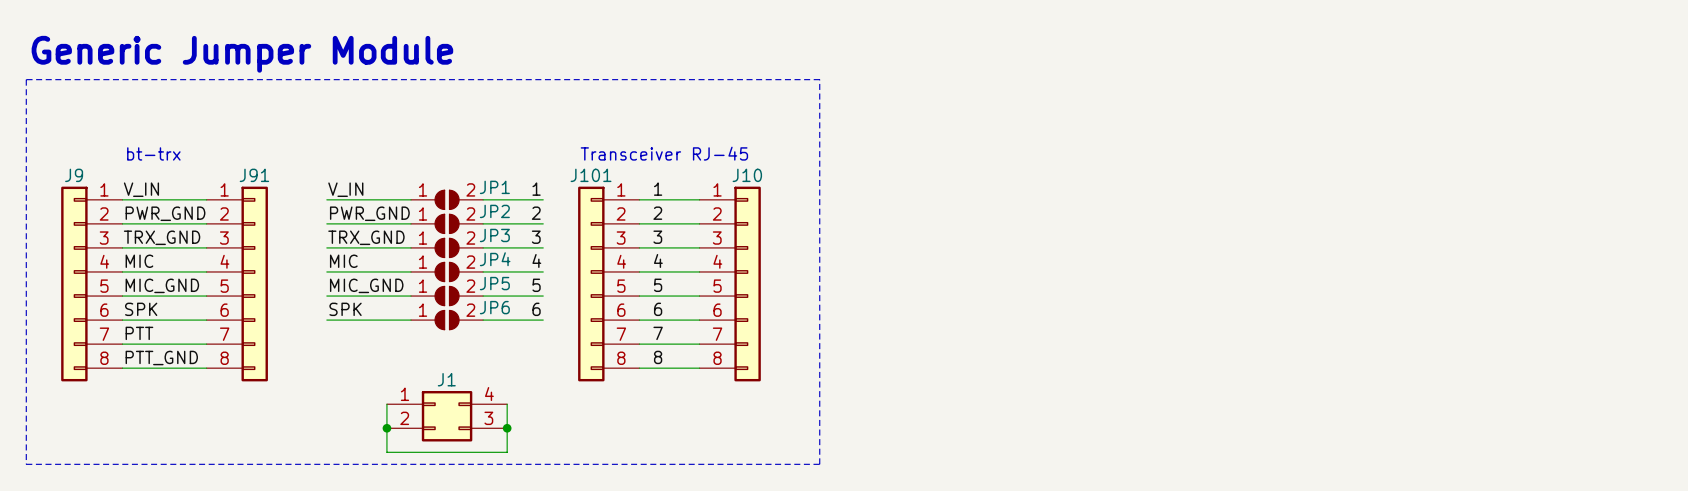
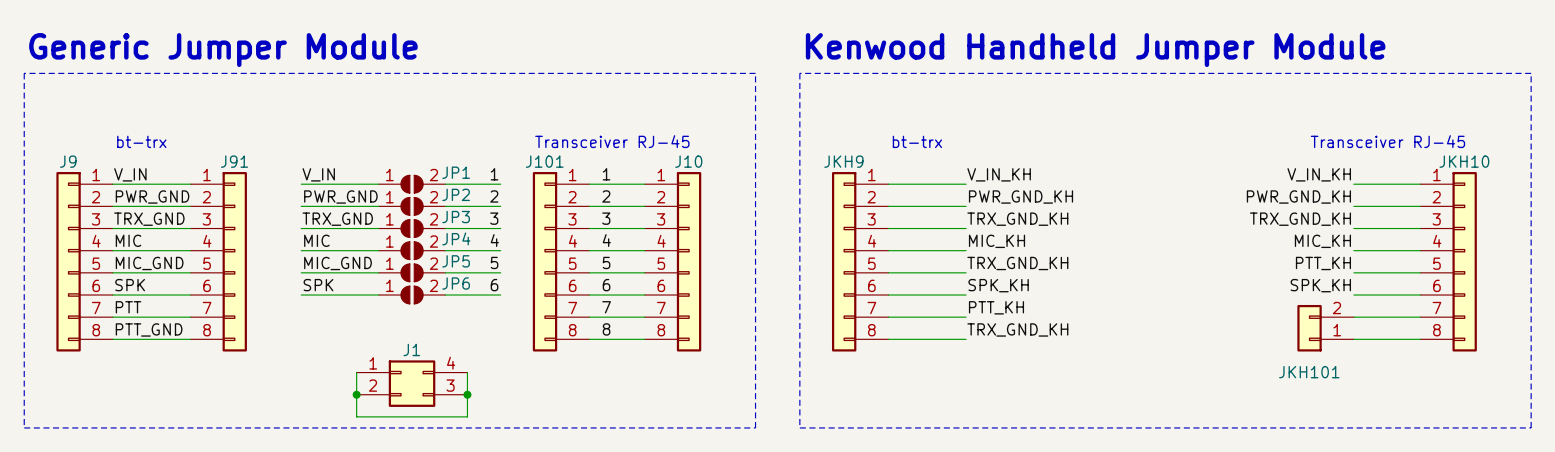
text: none -> Kenwood Handheld Jumper Module (1095, 50)
line: none -> (799, 73) (799, 427) (1531, 427) (1531, 73) (799, 73)
text: none -> bt-trx (917, 141)
text: none -> Transceiver RJ-45 (1387, 141)
label: none -> V_IN_KH (999, 174)
label: none -> V_IN_KH (1319, 174)
wire: none -> (888, 184) (966, 184)
wire: none -> (1353, 184) (1420, 184)
label: none -> PWR_GND_KH (1021, 197)
label: none -> PWR_GND_KH (1298, 197)
wire: none -> (888, 206) (966, 206)
wire: none -> (1353, 206) (1420, 206)
label: none -> TRX_GND_KH (1017, 219)
label: none -> TRX_GND_KH (1300, 219)
wire: none -> (888, 228) (966, 228)
wire: none -> (1353, 228) (1420, 228)
label: none -> MIC_KH (997, 241)
label: none -> MIC_KH (1322, 241)
wire: none -> (888, 250) (966, 250)
wire: none -> (1353, 250) (1420, 250)
JKH9: none -> (860, 261)
JKH10: none -> (1448, 261)
label: none -> TRX_GND_KH (1017, 263)
label: none -> PTT_KH (1323, 263)
wire: none -> (888, 272) (966, 272)
wire: none -> (1353, 272) (1420, 272)
label: none -> SPK_KH (998, 285)
label: none -> SPK_KH (1320, 285)
wire: none -> (888, 295) (966, 295)
wire: none -> (1353, 295) (1420, 295)
label: none -> PTT_KH (996, 307)
wire: none -> (888, 317) (966, 317)
wire: none -> (1353, 317) (1420, 317)
JKH101: none -> (1325, 328)
label: none -> TRX_GND_KH (1017, 329)
wire: none -> (888, 339) (966, 339)
wire: none -> (1353, 339) (1420, 339)

